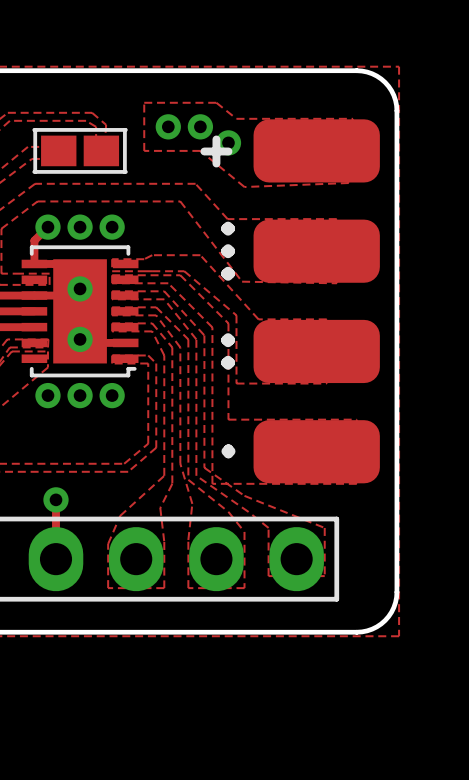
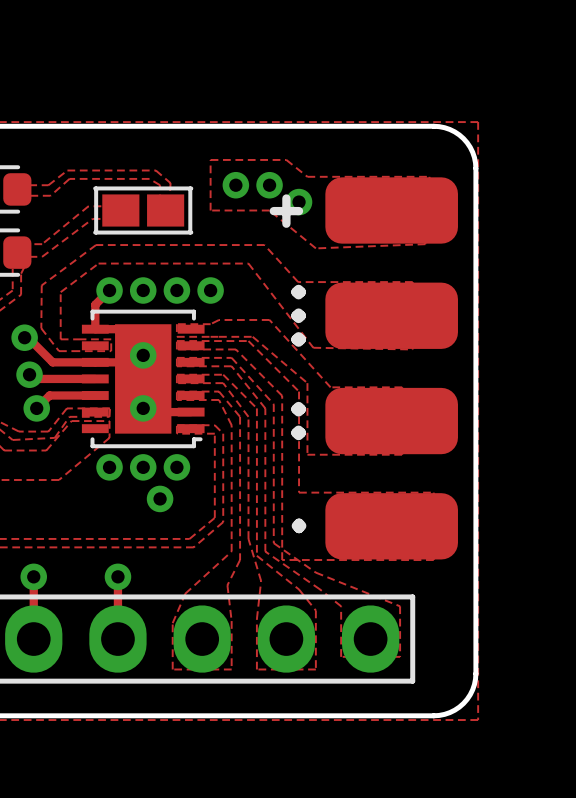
via: none -> (210, 290)
via: none -> (160, 498)

